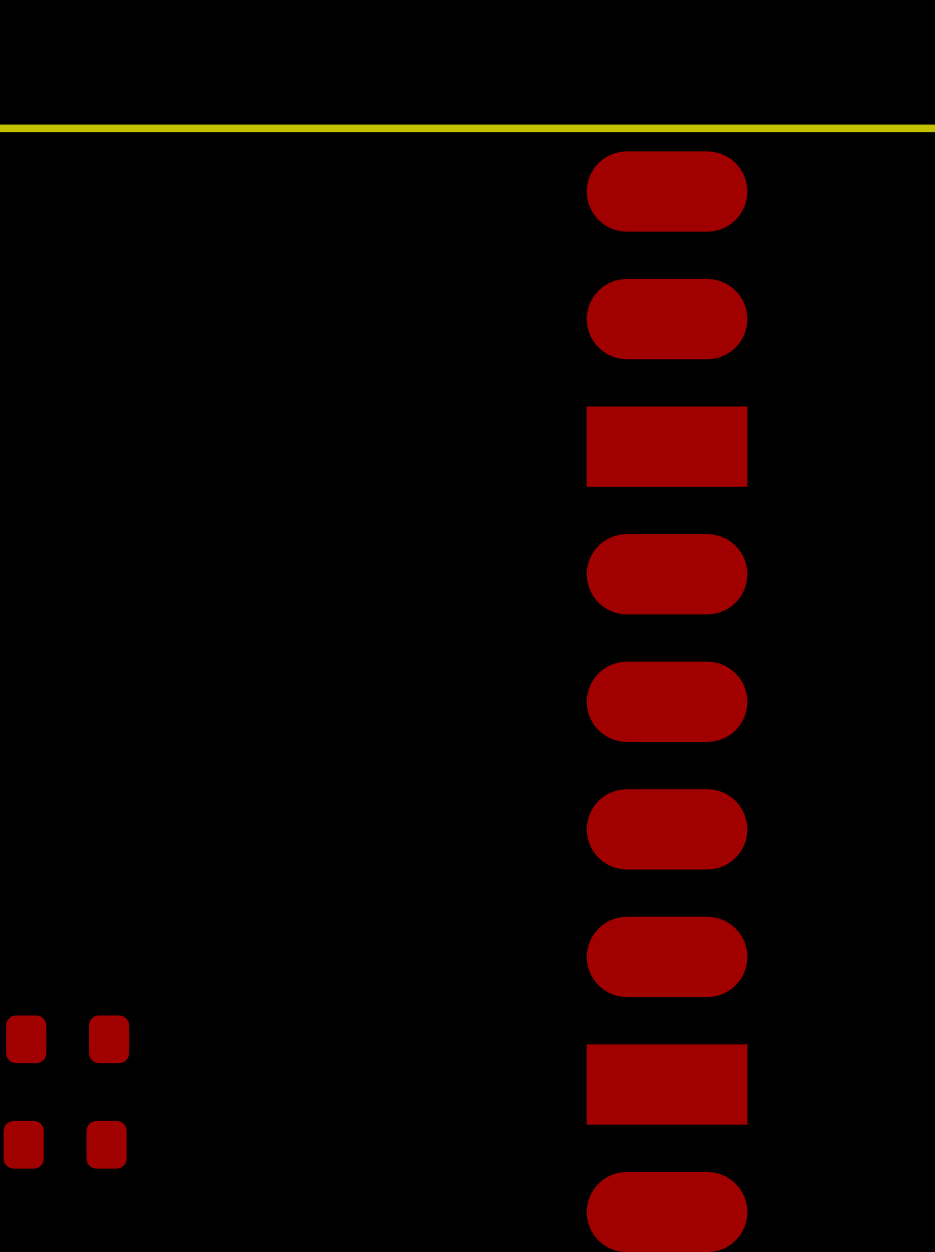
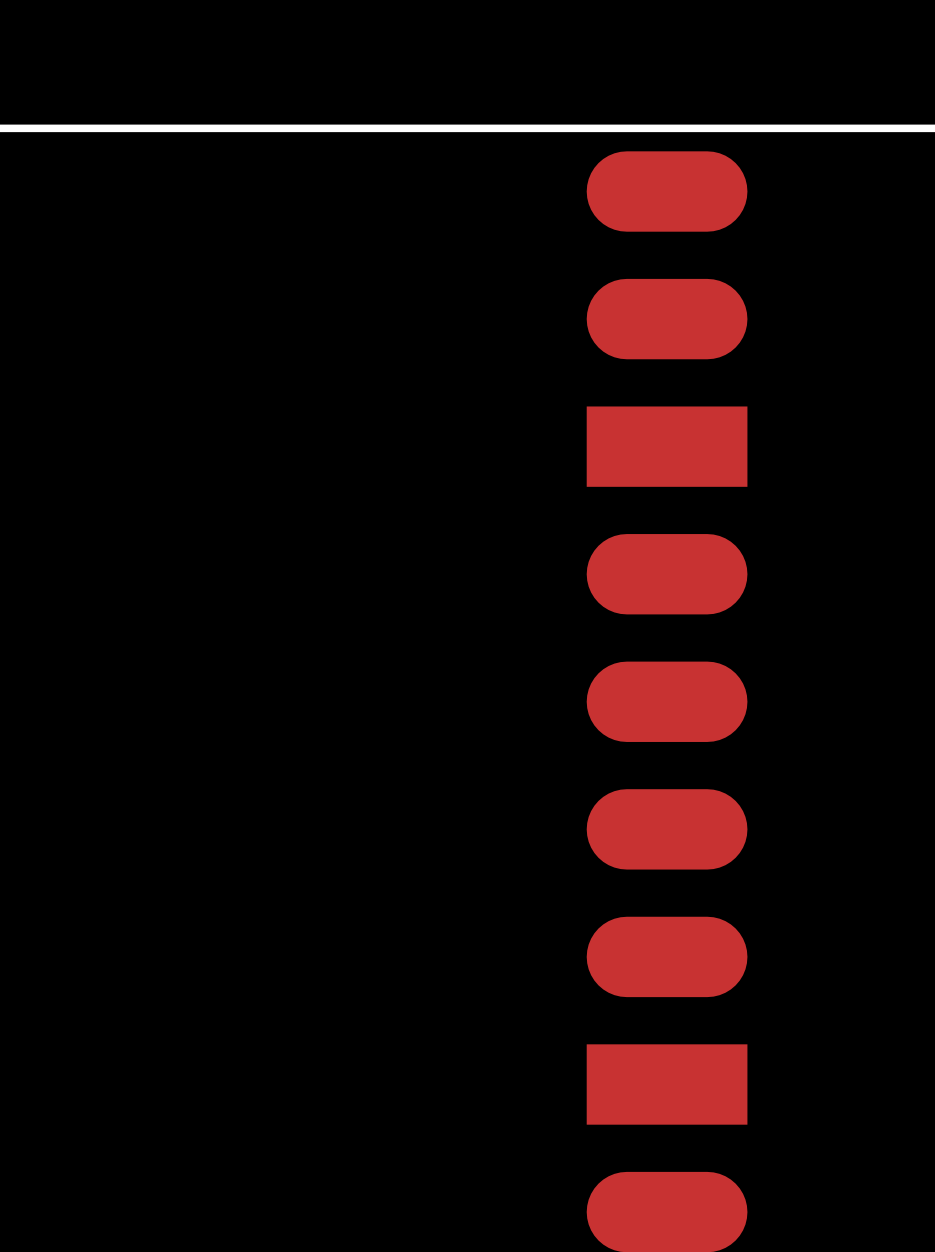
part: (67, 1039) -> none
part: (65, 1144) -> none

